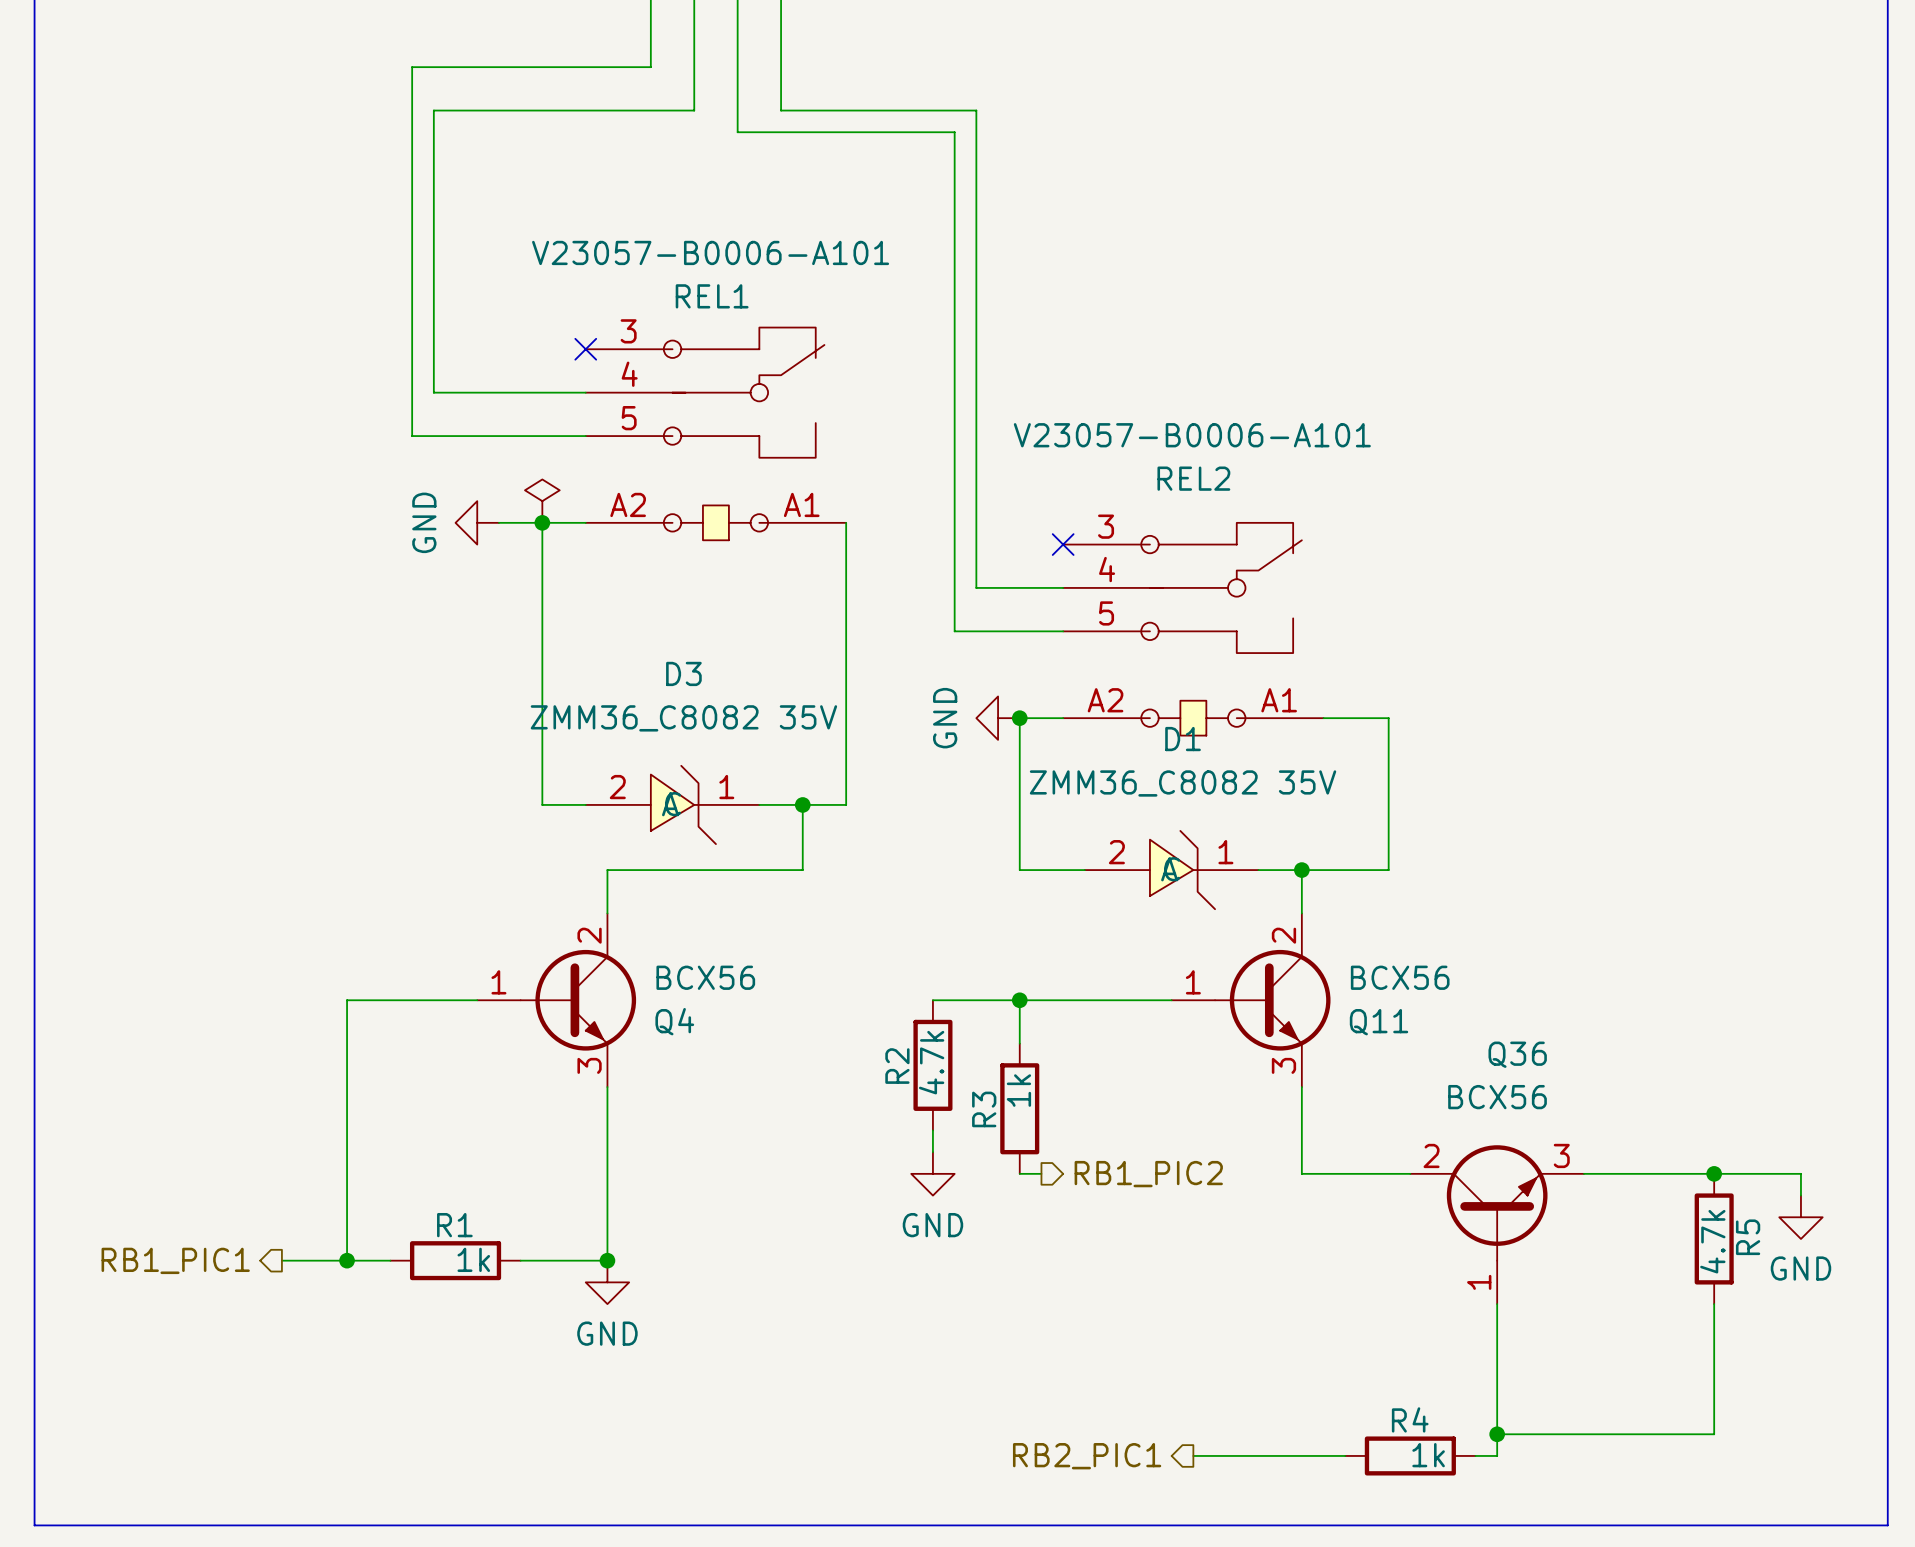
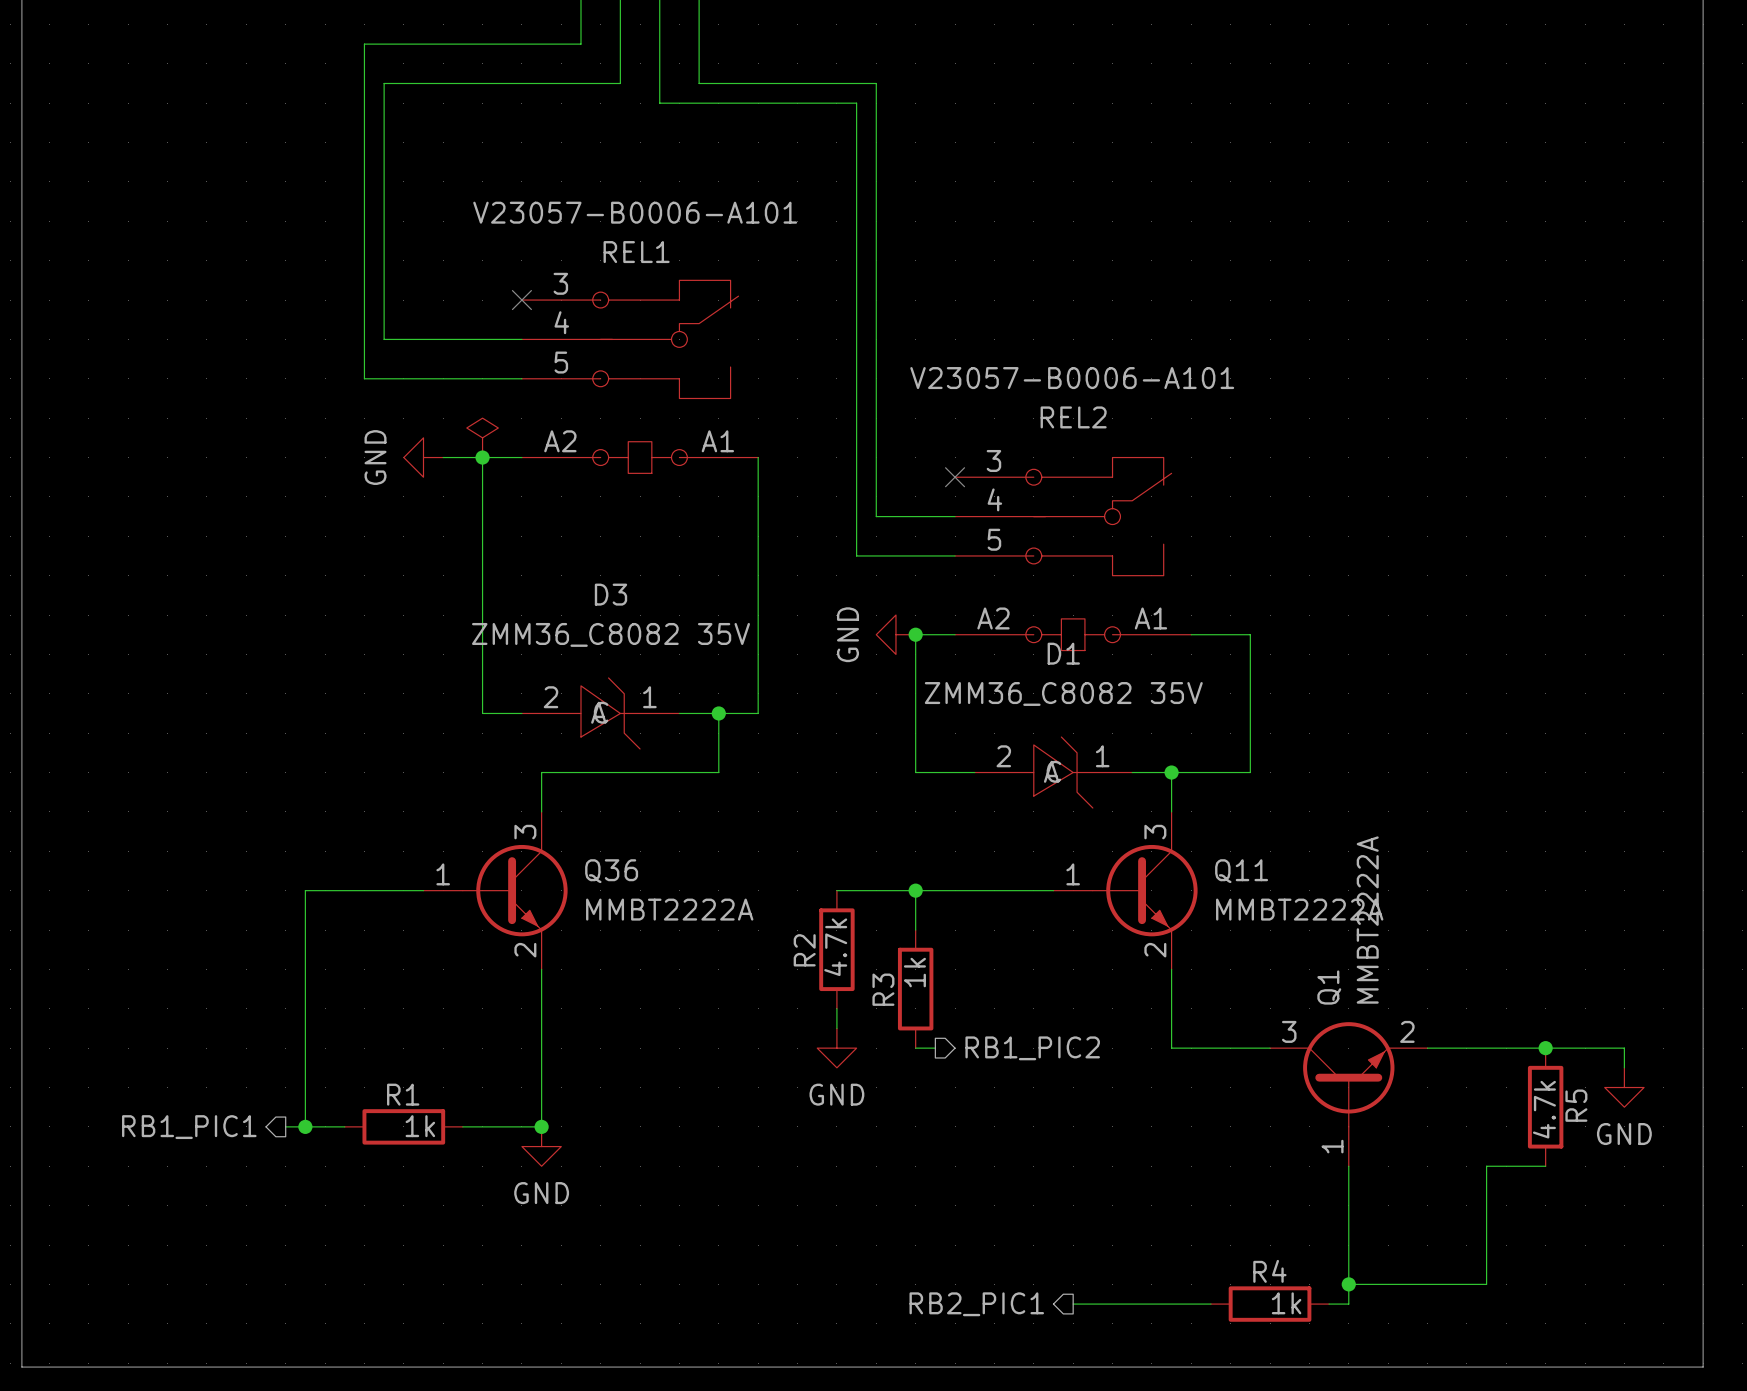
Q11 pin number: 2 (1283, 935) -> 3 (1155, 832)
Q11 value: BCX56 (1400, 977) -> MMBT2222A (1299, 909)
Q4: BCX56 (556, 1000) -> none
Q11 name position: Q11 (1379, 1022) -> Q11 (1241, 871)
Q36 name position: Q36 (1517, 1054) -> Q36 (611, 871)
Q11 pin number: 3 (1283, 1065) -> 2 (1155, 950)
Q36 value: BCX56 (1497, 1097) -> MMBT2222A (669, 909)
Q36 symbol: [1410, 1145, 1584, 1305] -> [423, 811, 568, 970]
Q1: none -> MMBT2222A (1348, 1094)
hierarchical label position: RB1_PIC1 (175, 1260) -> RB1_PIC1 (189, 1127)
wire: (281, 1260) (325, 1260) -> none
wire: (1714, 1304) (1714, 1434) (1649, 1434) -> (1545, 1166) (1486, 1166) (1486, 1284)

